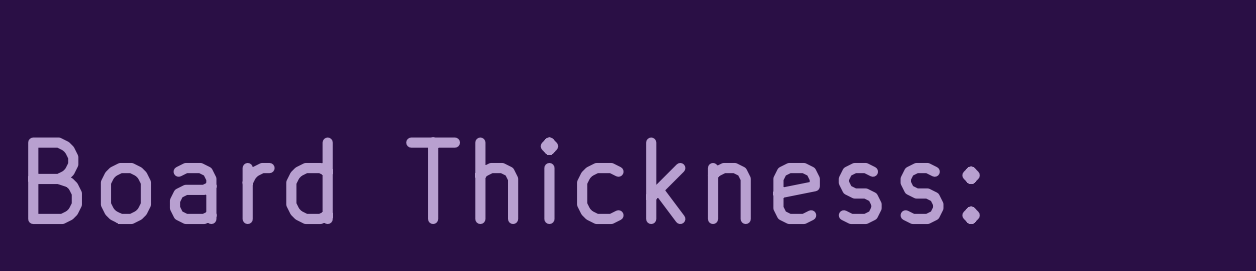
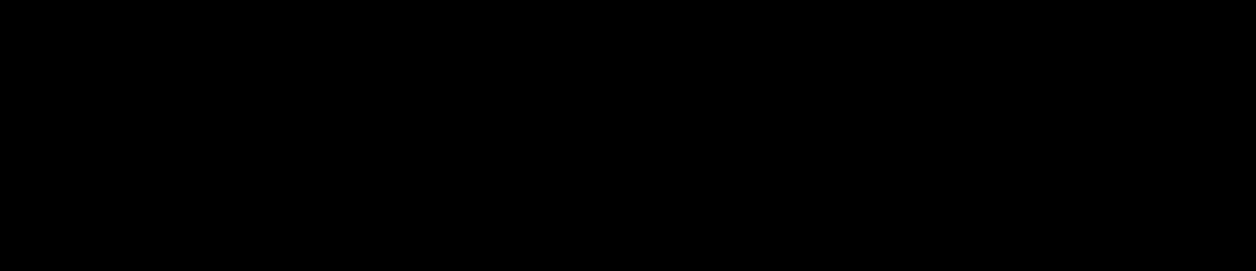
text: Board Thickness: (503, 180) -> none

